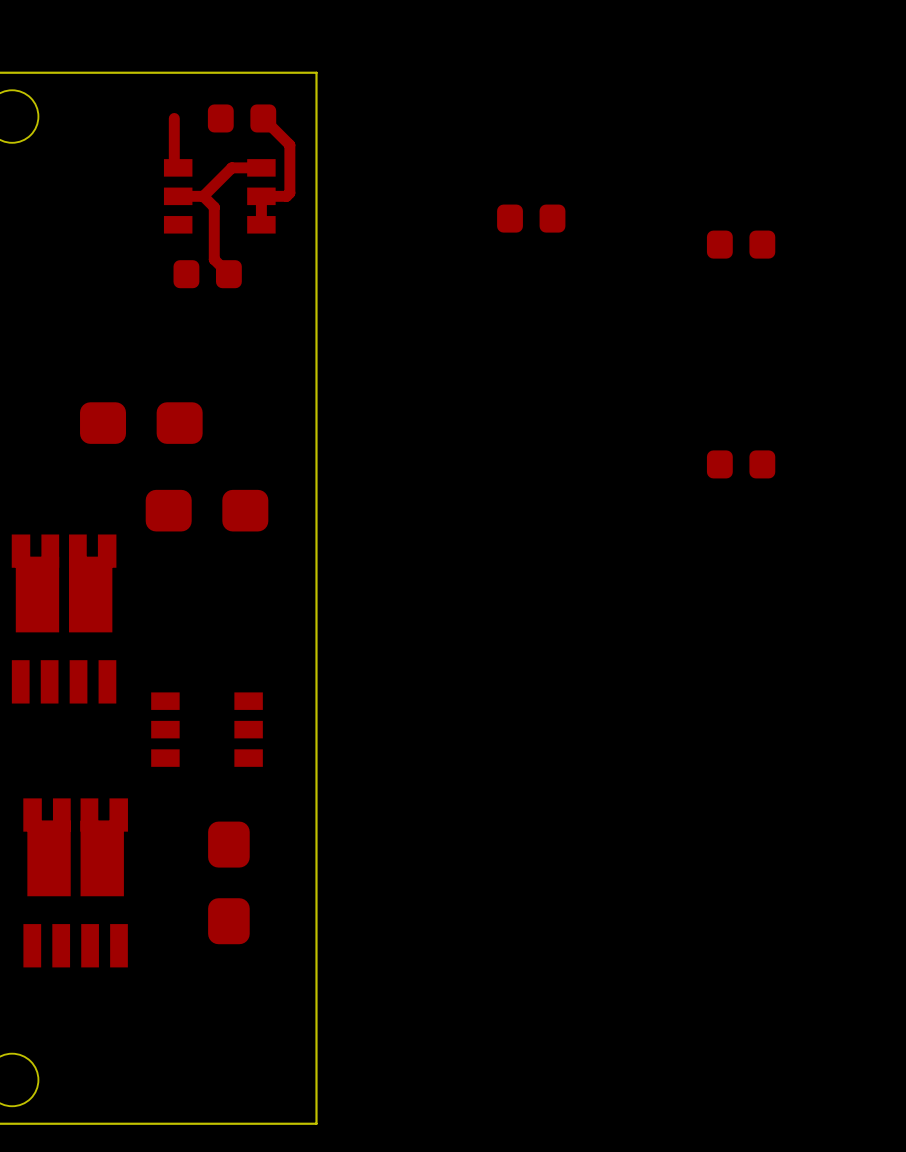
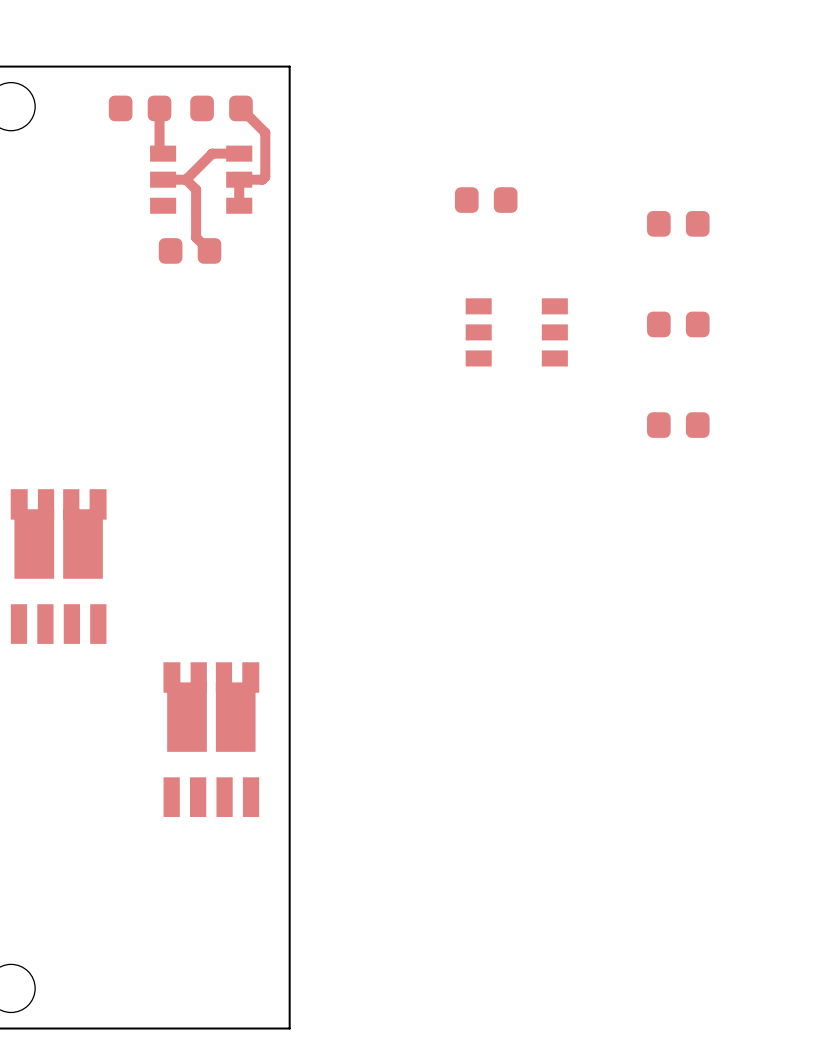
part: none -> (140, 108)
part: none -> (678, 324)
part: (141, 423) -> none
part: (207, 510) -> none
part position: (207, 729) -> (516, 332)
part position: (75, 882) -> (211, 739)
part: (228, 882) -> none

